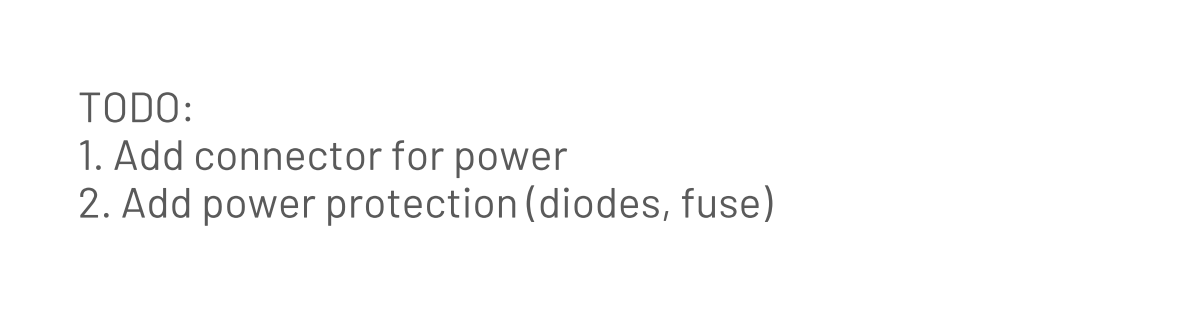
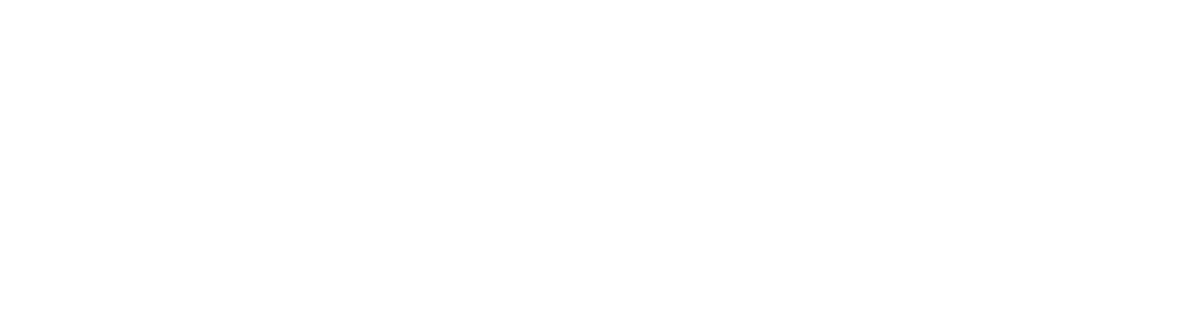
text: TODO: (134, 107) -> none
text: 1. Add connector for power (323, 159) -> none
text: 2. Add power protection (diodes, fuse) (426, 205) -> none

